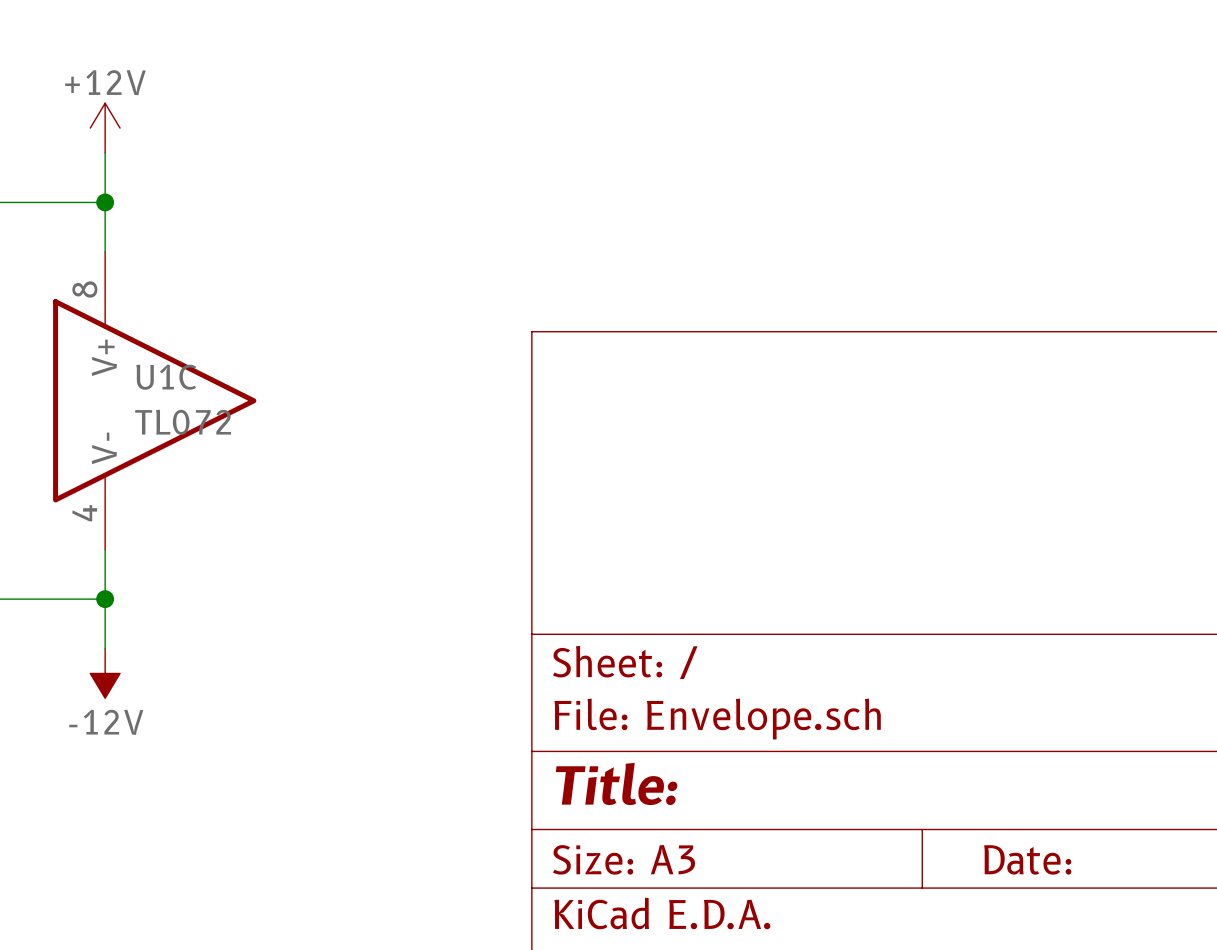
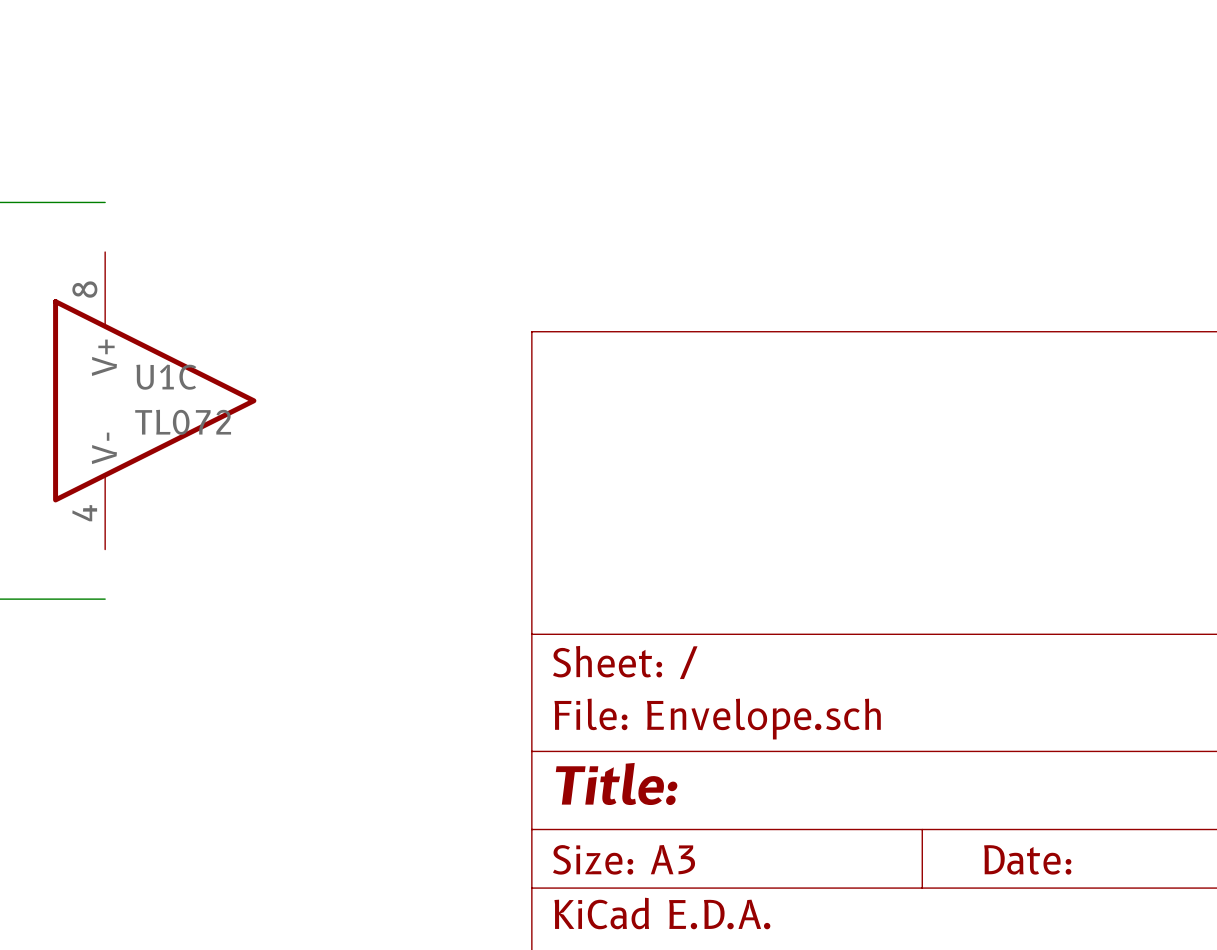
power symbol: +12V (105, 128) -> none
wire: (105, 152) (105, 252) -> none
junction: (105, 202) -> none
wire: (105, 549) (105, 648) -> none
junction: (105, 599) -> none
power symbol: -12V (105, 673) -> none

